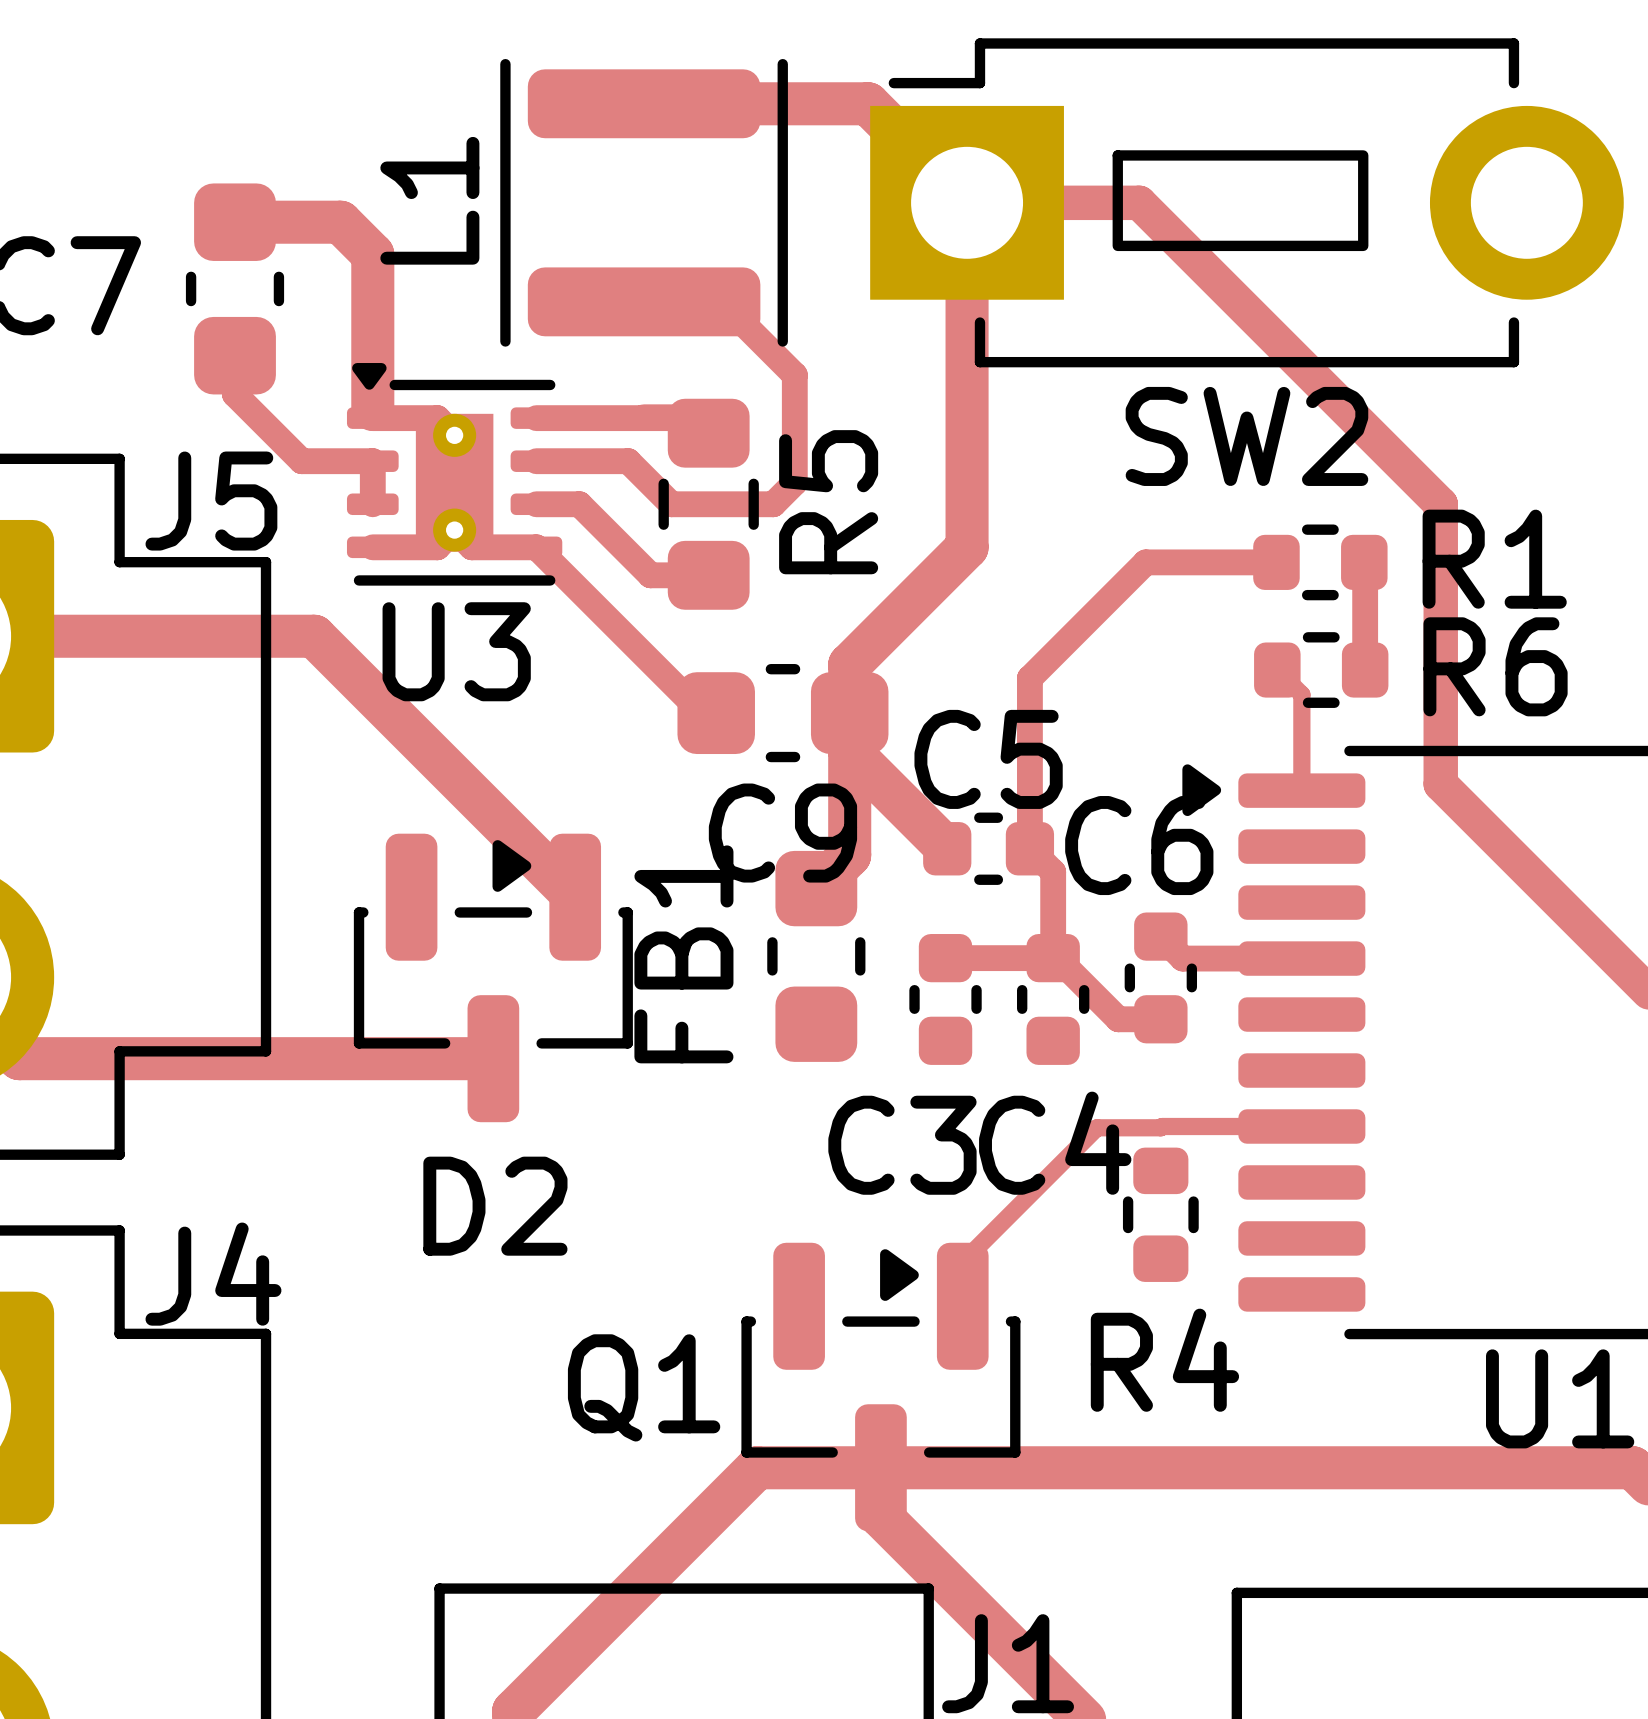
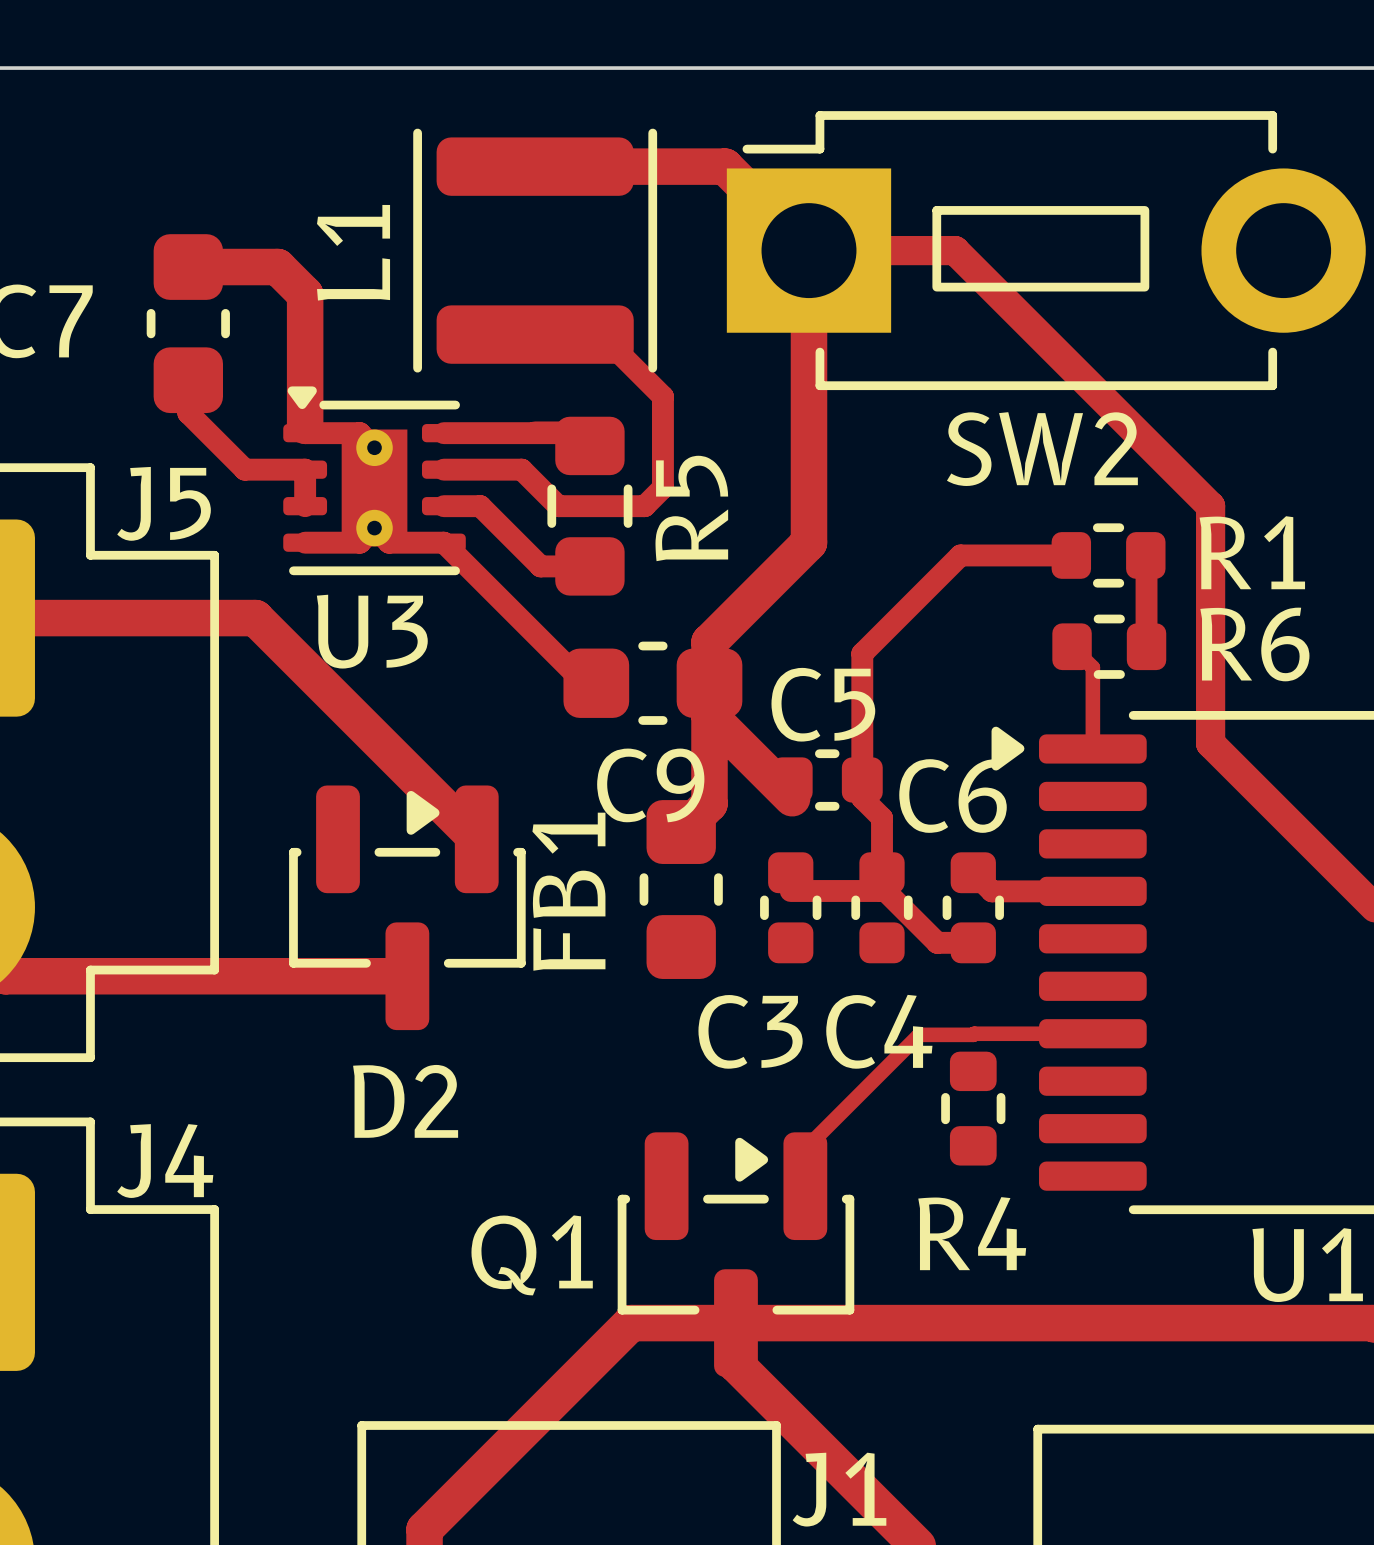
C5 position: (988, 848) -> (827, 780)
C3 position: (945, 999) -> (790, 907)
C4 position: (1053, 999) -> (882, 907)

